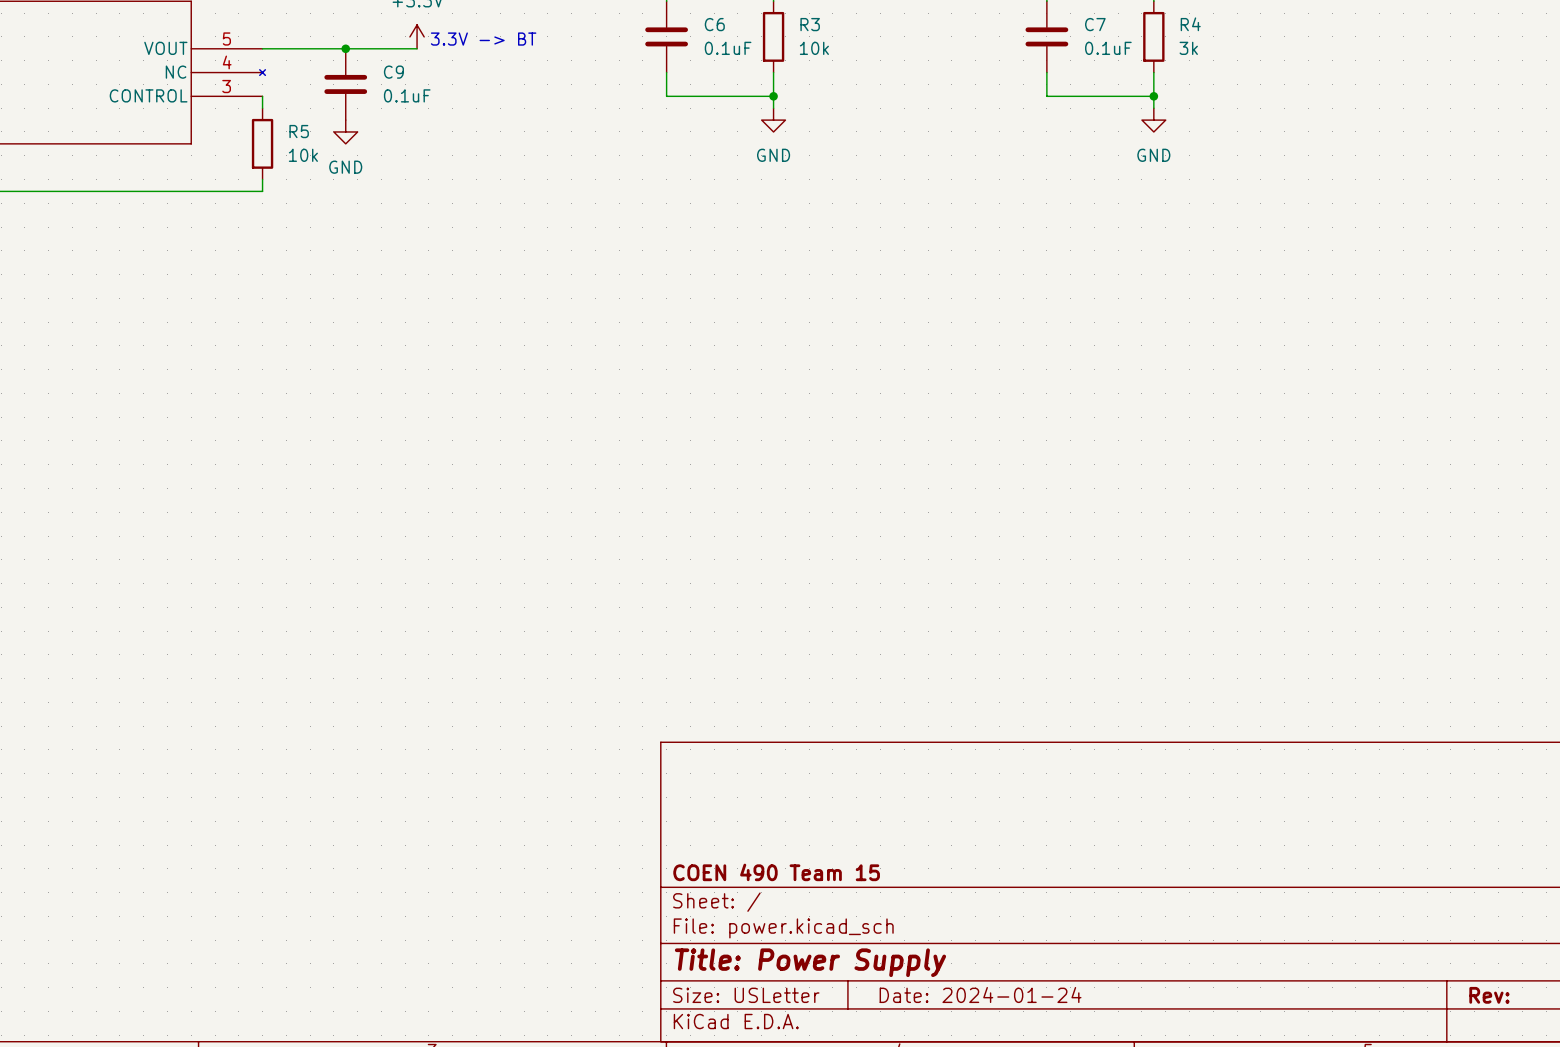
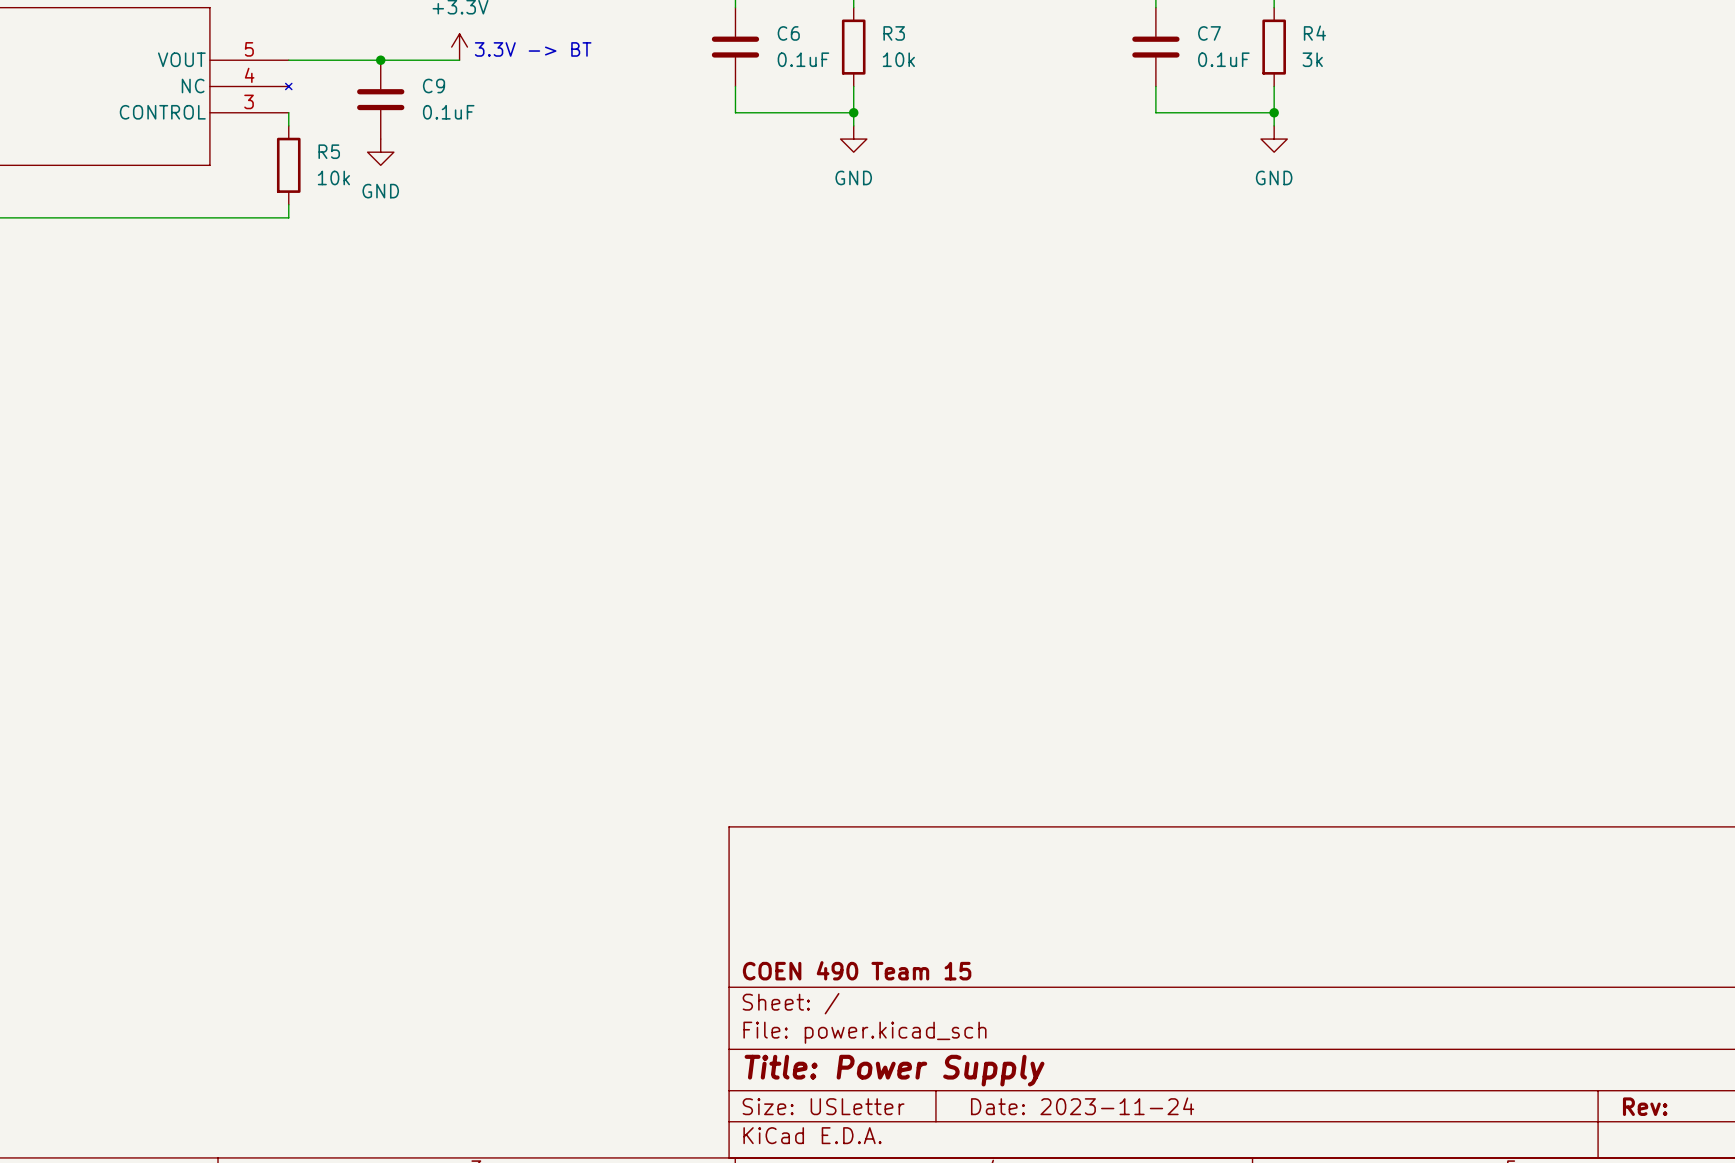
title block: Date: 2024-01-24 (980, 994) -> Date: 2023-11-24 (1082, 1106)

